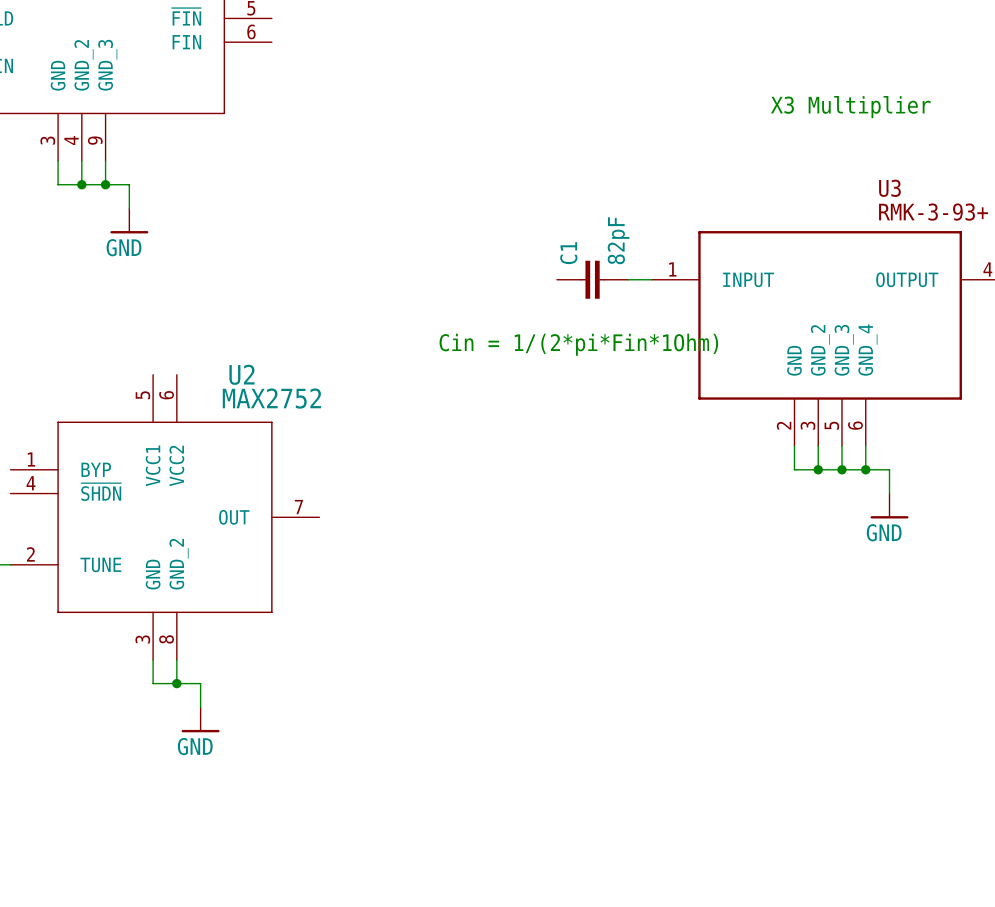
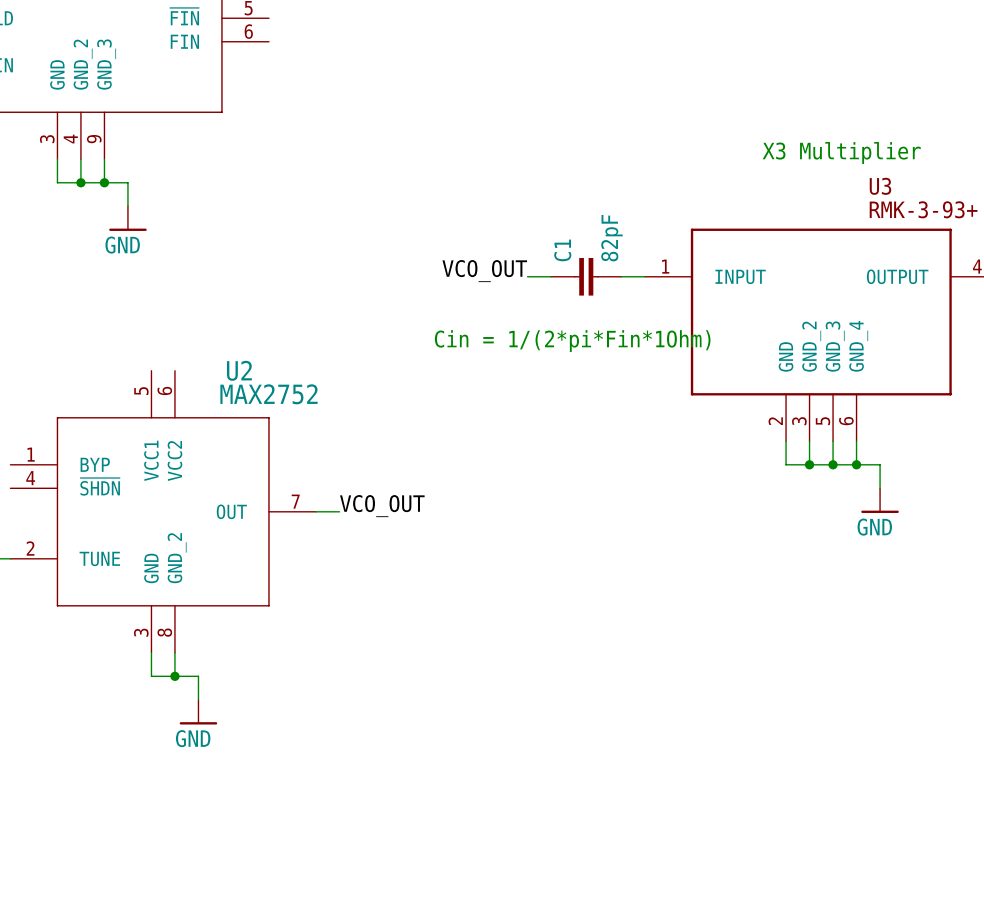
text position: X3 Multiplier (850, 107) -> X3 Multiplier (841, 152)
label: none -> VCO_OUT (484, 271)
wire: none -> (527, 276) (551, 276)
label: none -> VCO_OUT (382, 506)
wire: none -> (315, 511) (339, 511)

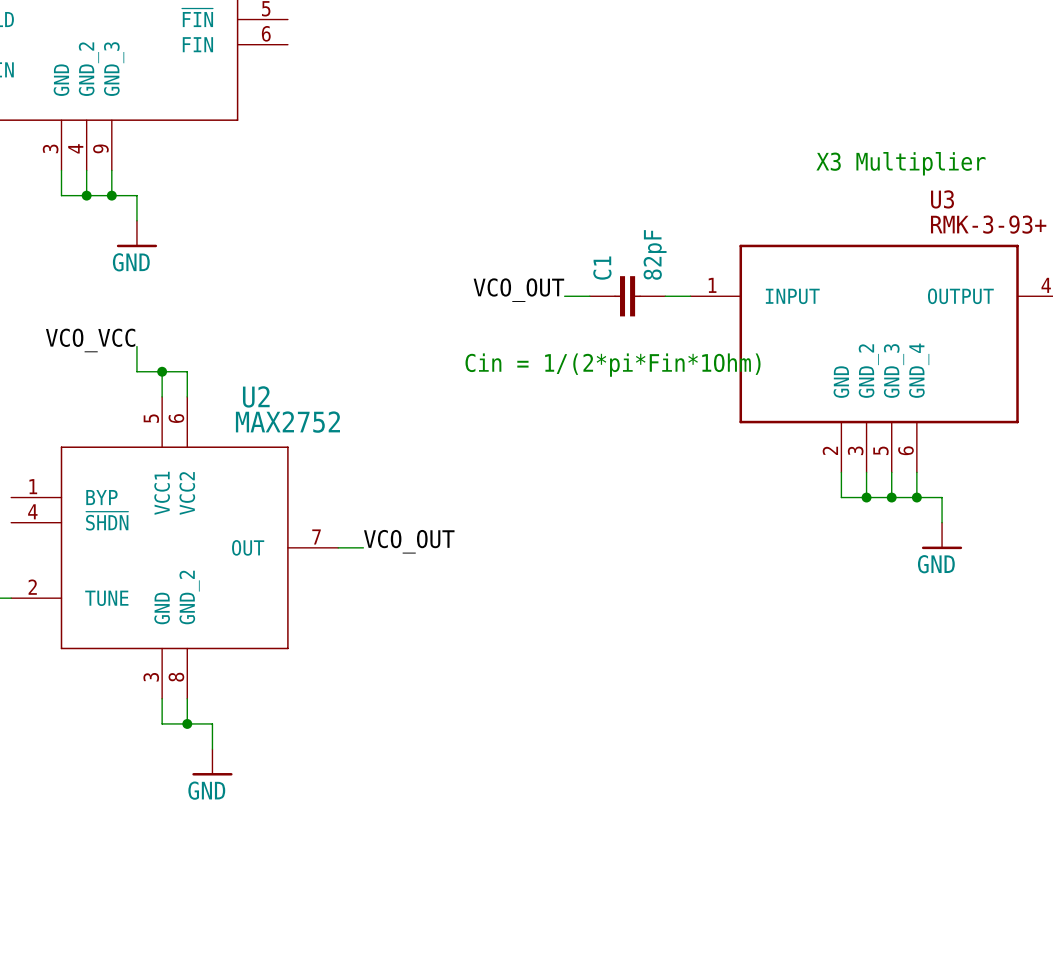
label: none -> VCO_VCC (90, 340)
wire: none -> (136, 346) (136, 371) (187, 371) (187, 396)
wire: none -> (162, 371) (162, 396)
junction: none -> (162, 371)

